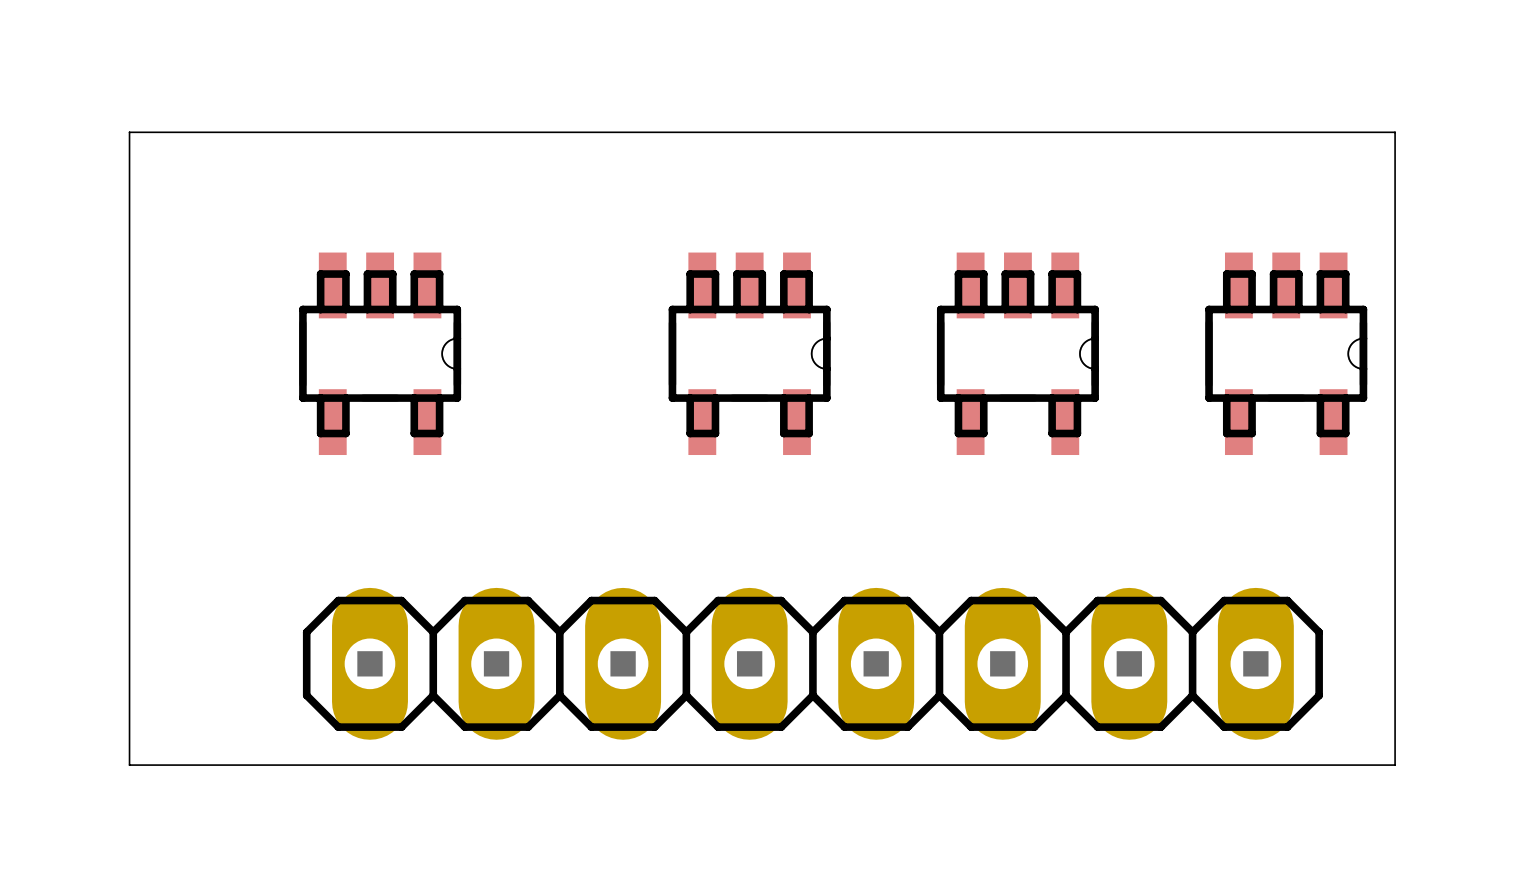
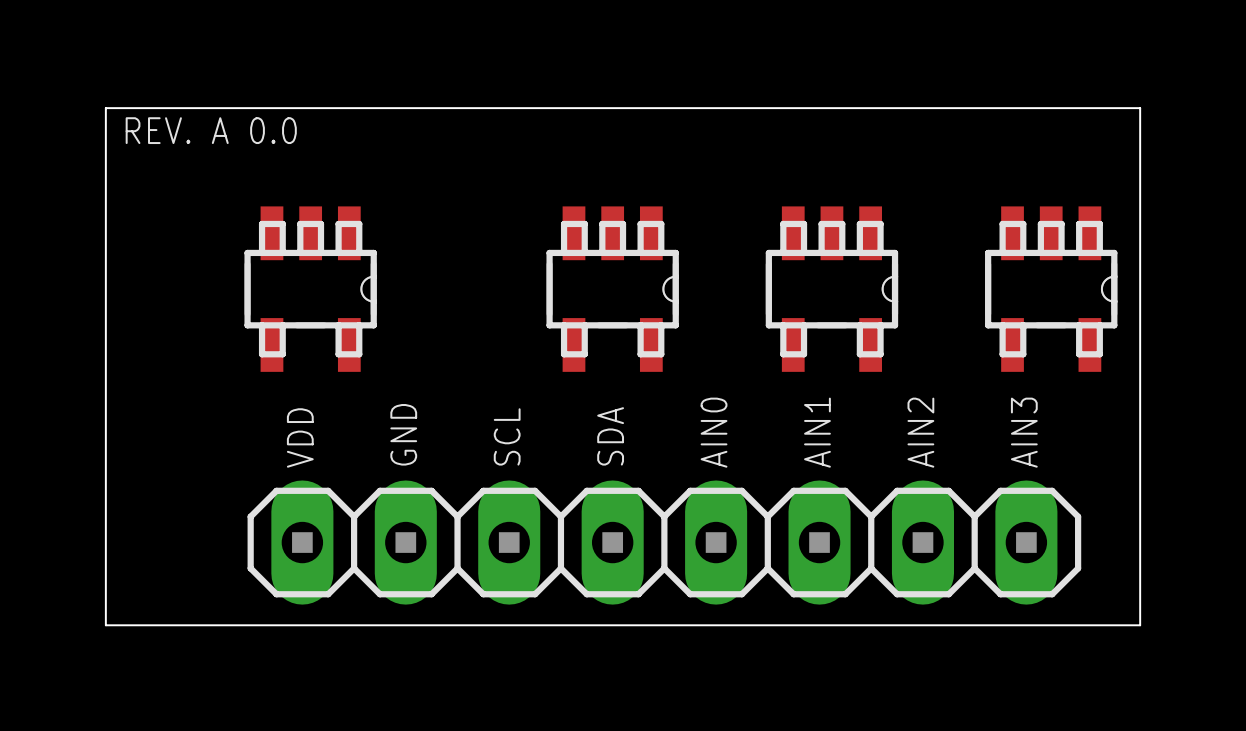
text: none -> REV. A 0.0 (211, 130)
text: none -> AIN0 (714, 432)
text: none -> AIN1 (817, 432)
text: none -> AIN2 (920, 432)
text: none -> AIN3 (1024, 432)
text: none -> GND (403, 434)
text: none -> SDA (610, 436)
text: none -> SCL (507, 436)
text: none -> VDD (300, 437)

